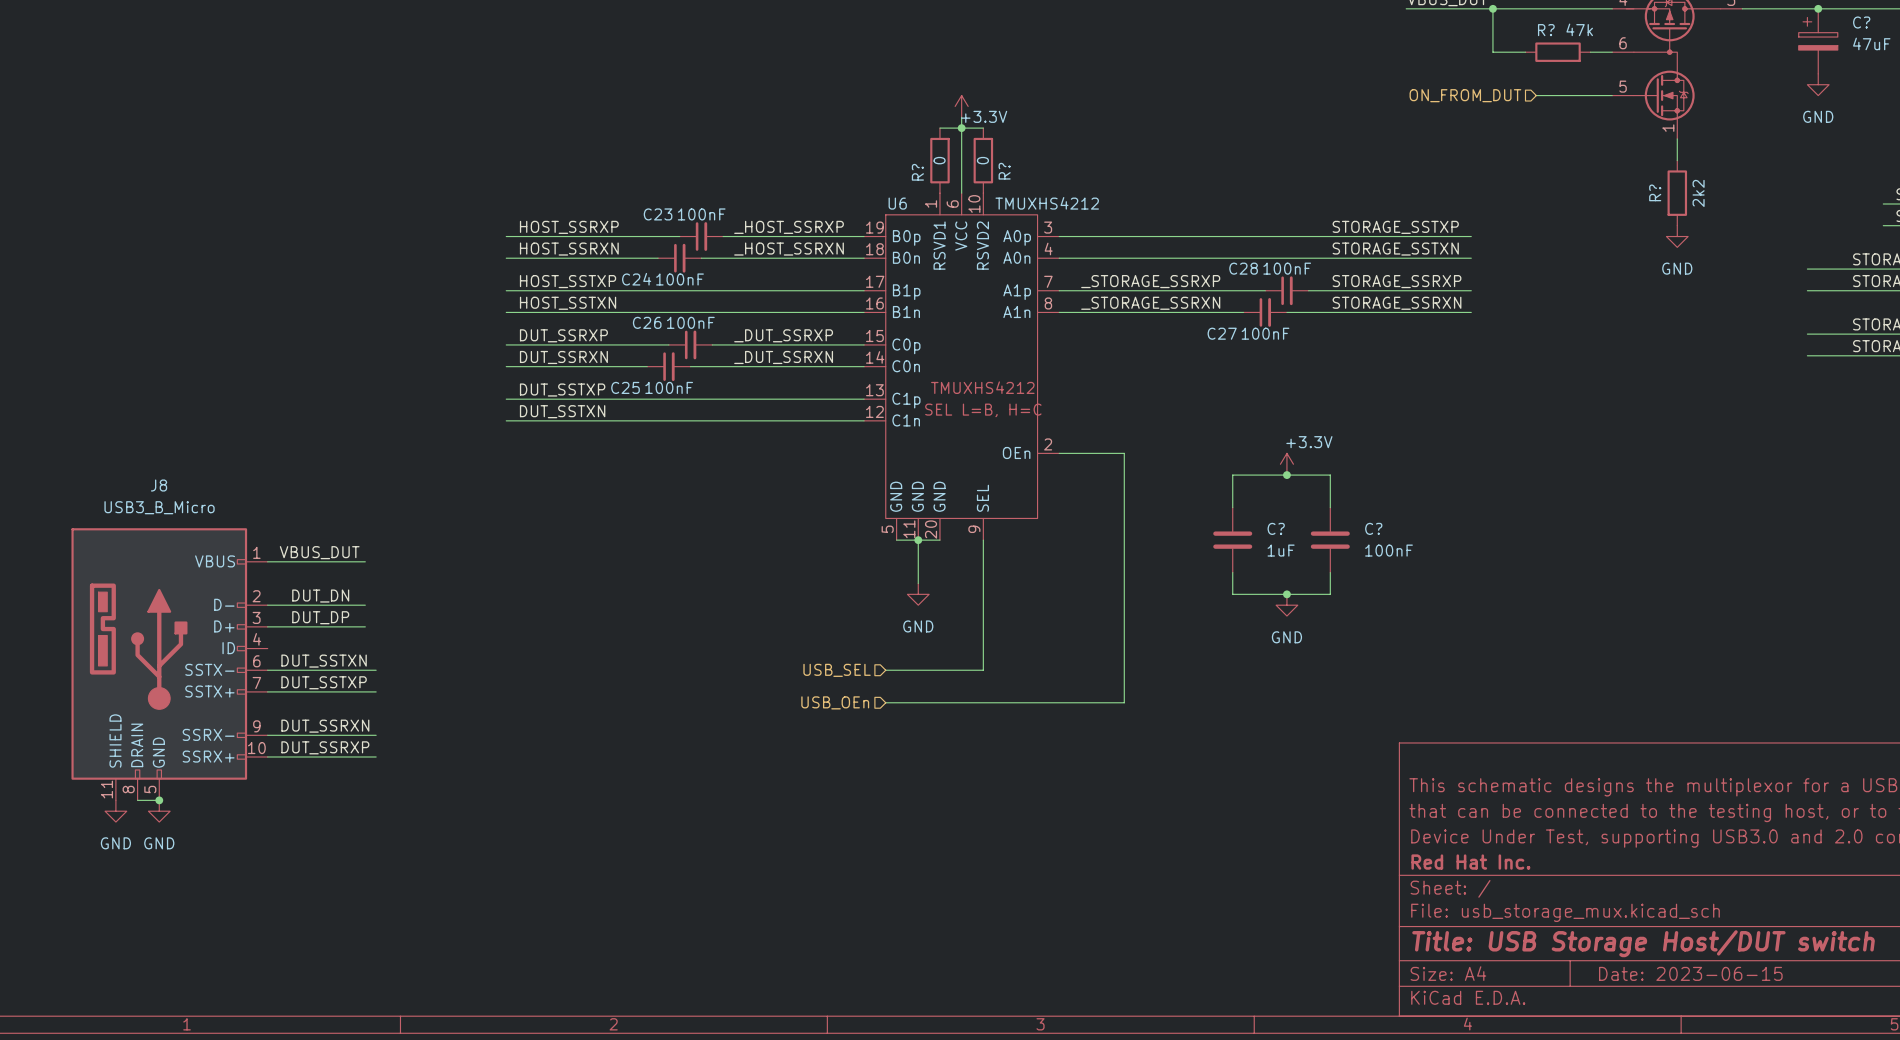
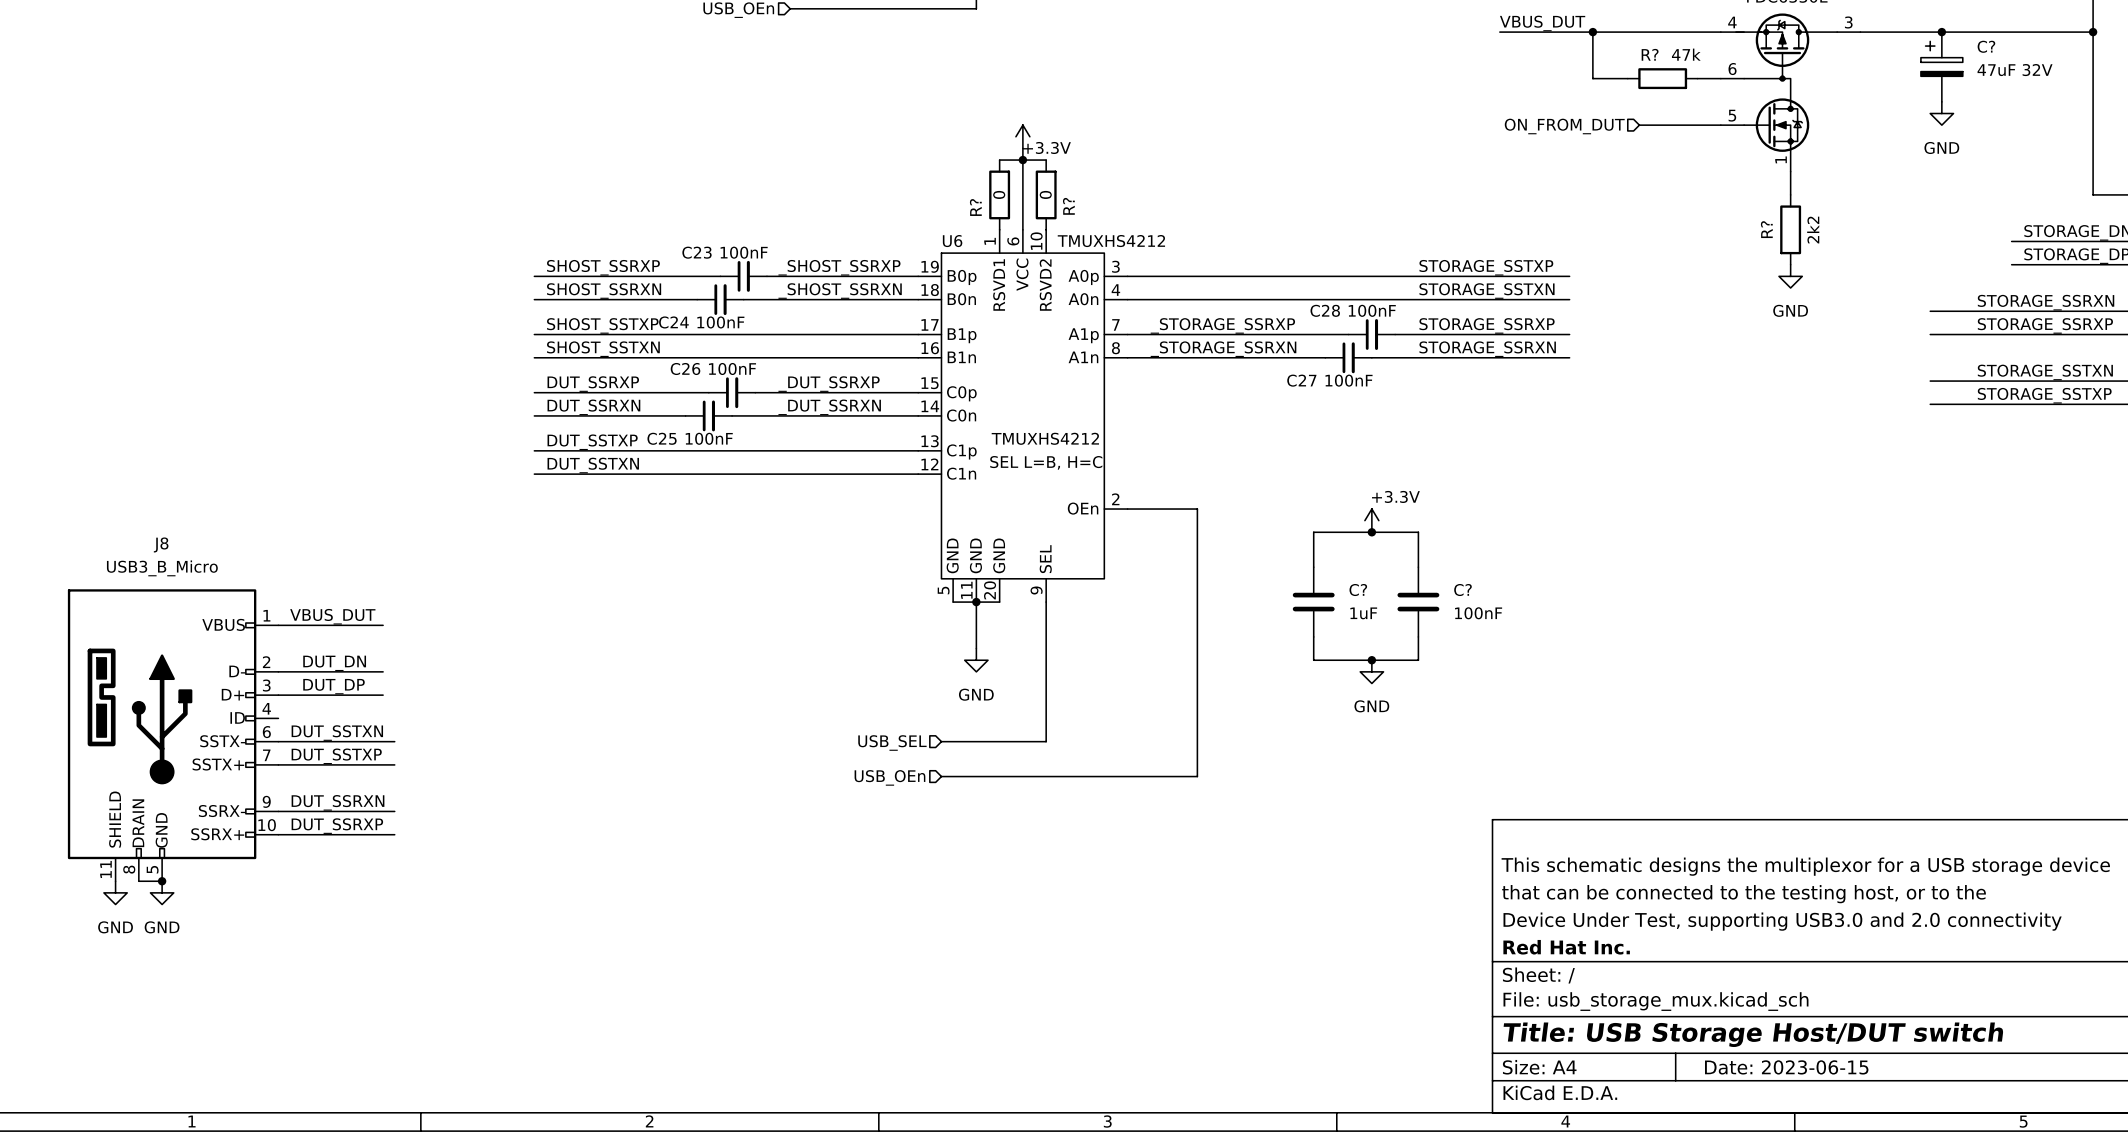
label: HOST_SSRXP (569, 227) -> SHOST_SSRXP (603, 267)
label: _HOST_SSRXP (789, 227) -> _SHOST_SSRXP (839, 267)
label: HOST_SSRXN (569, 249) -> SHOST_SSRXN (604, 291)
label: _HOST_SSRXN (789, 249) -> _SHOST_SSRXN (840, 291)
label: HOST_SSTXP (568, 281) -> SHOST_SSTXP (602, 325)
label: HOST_SSTXN (568, 303) -> SHOST_SSTXN (603, 349)

